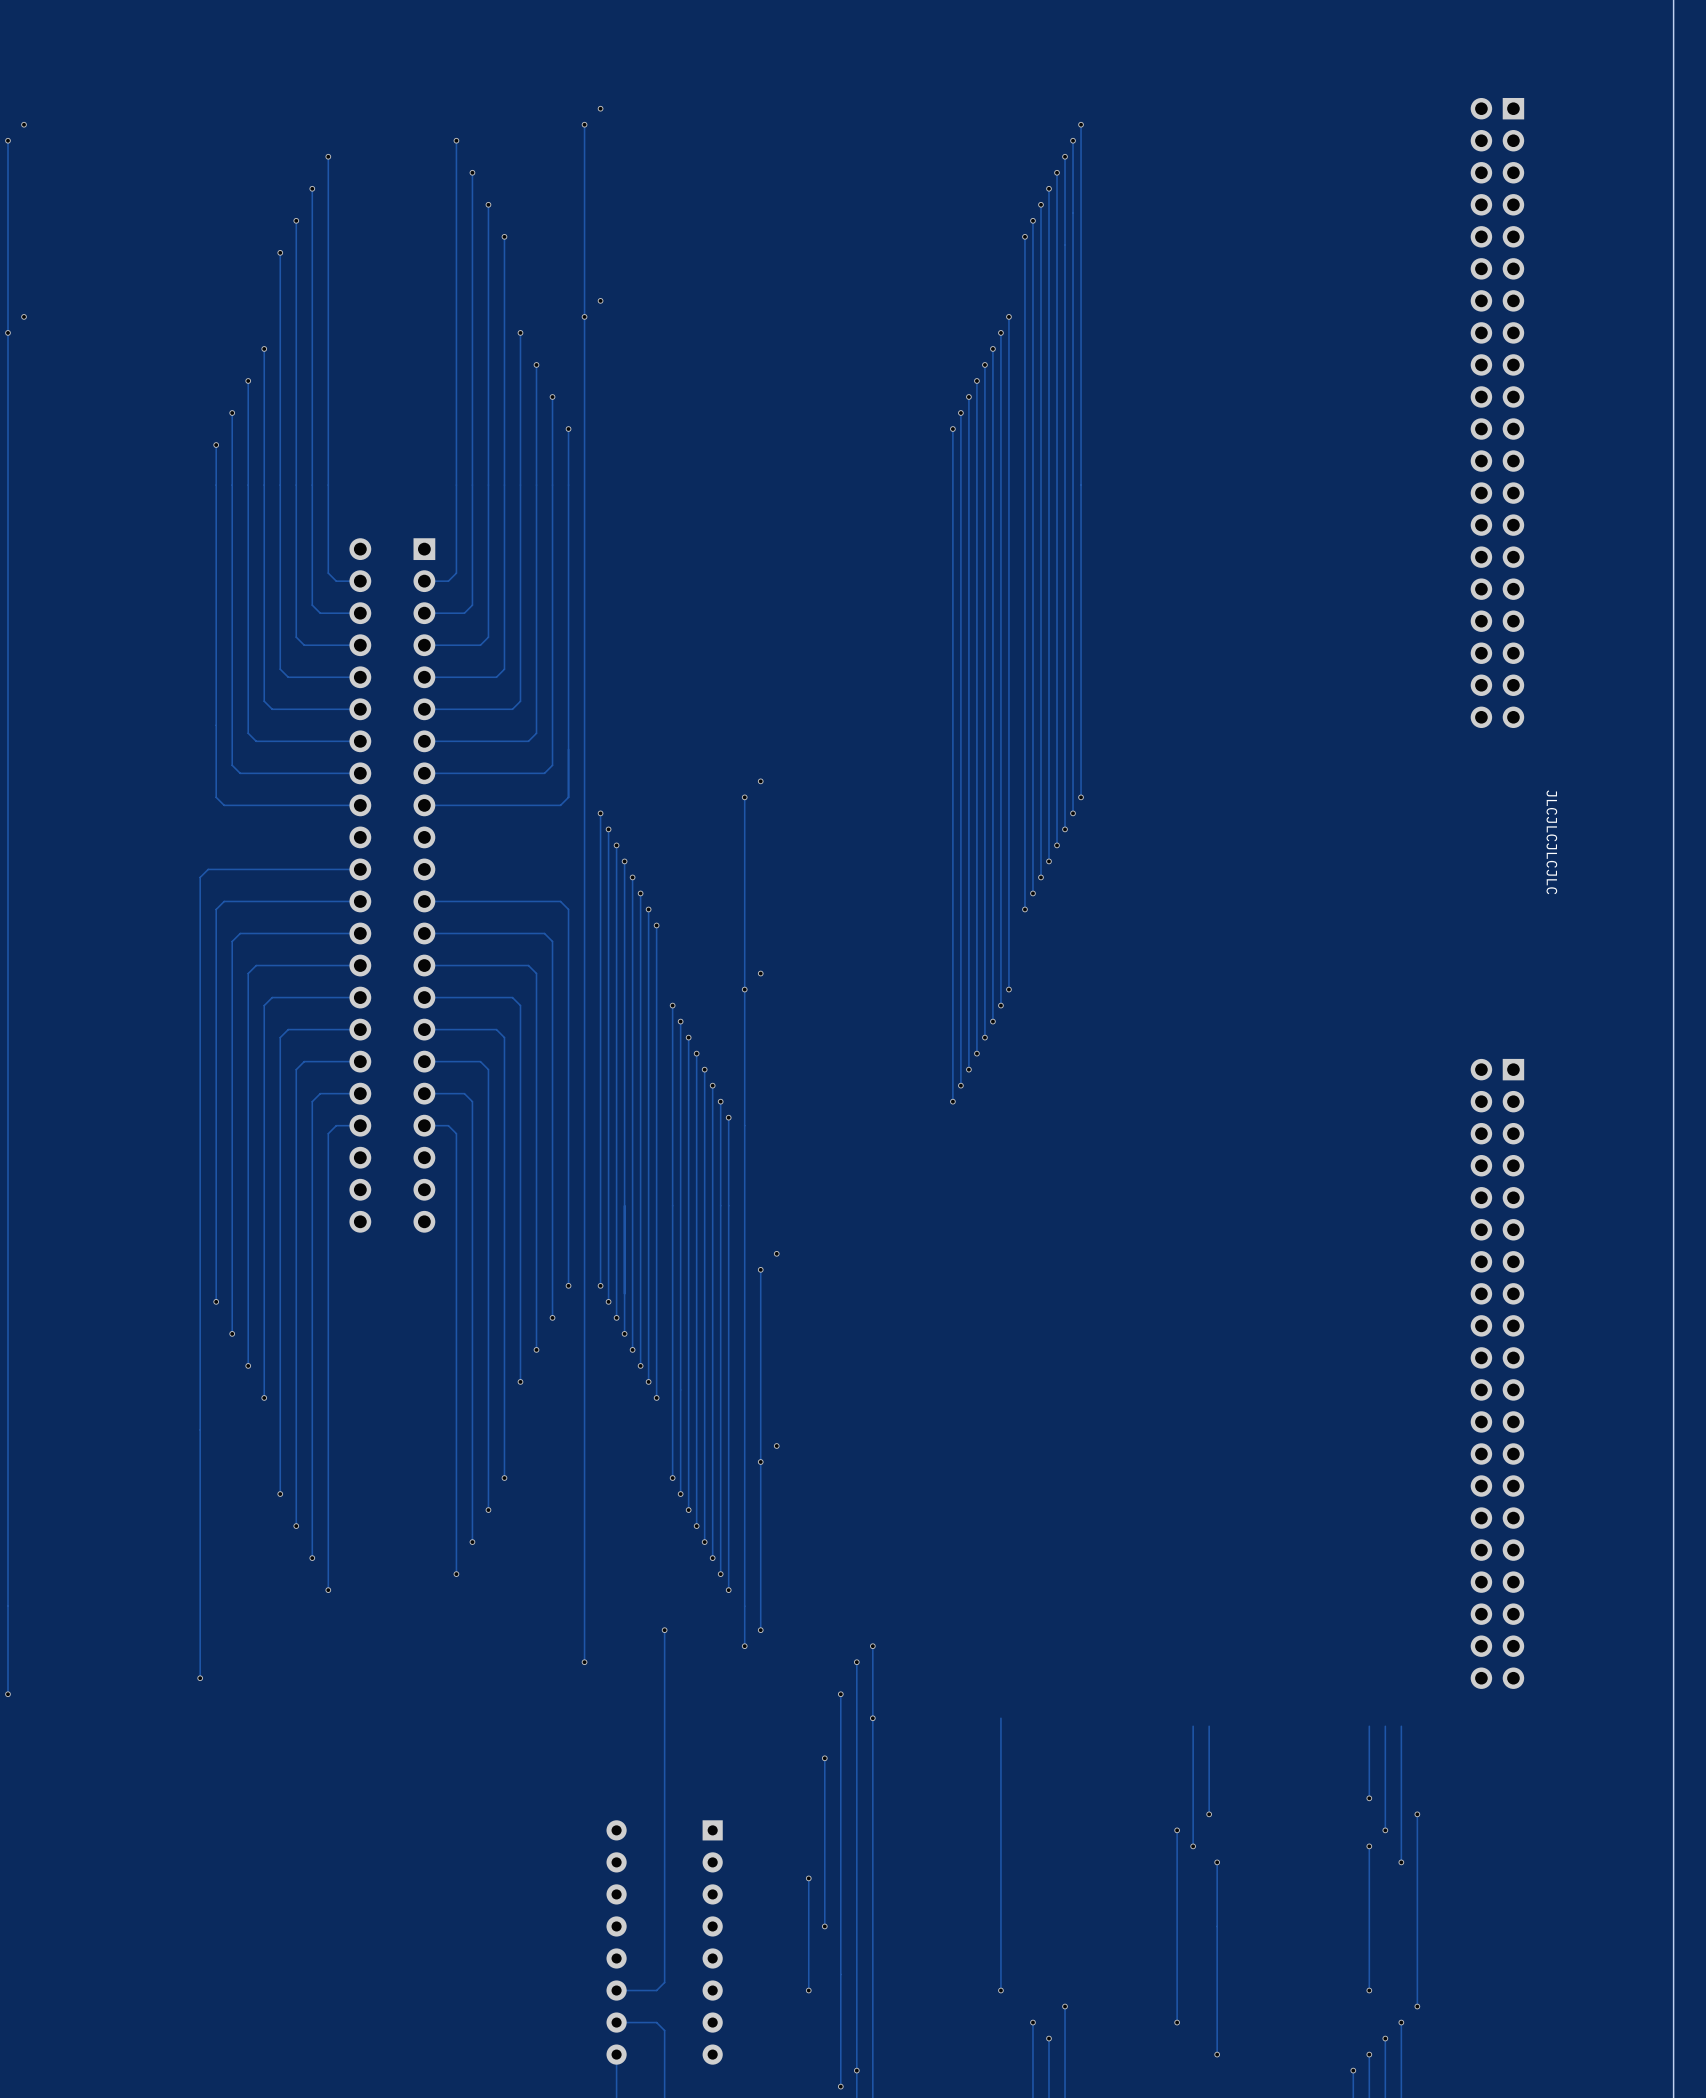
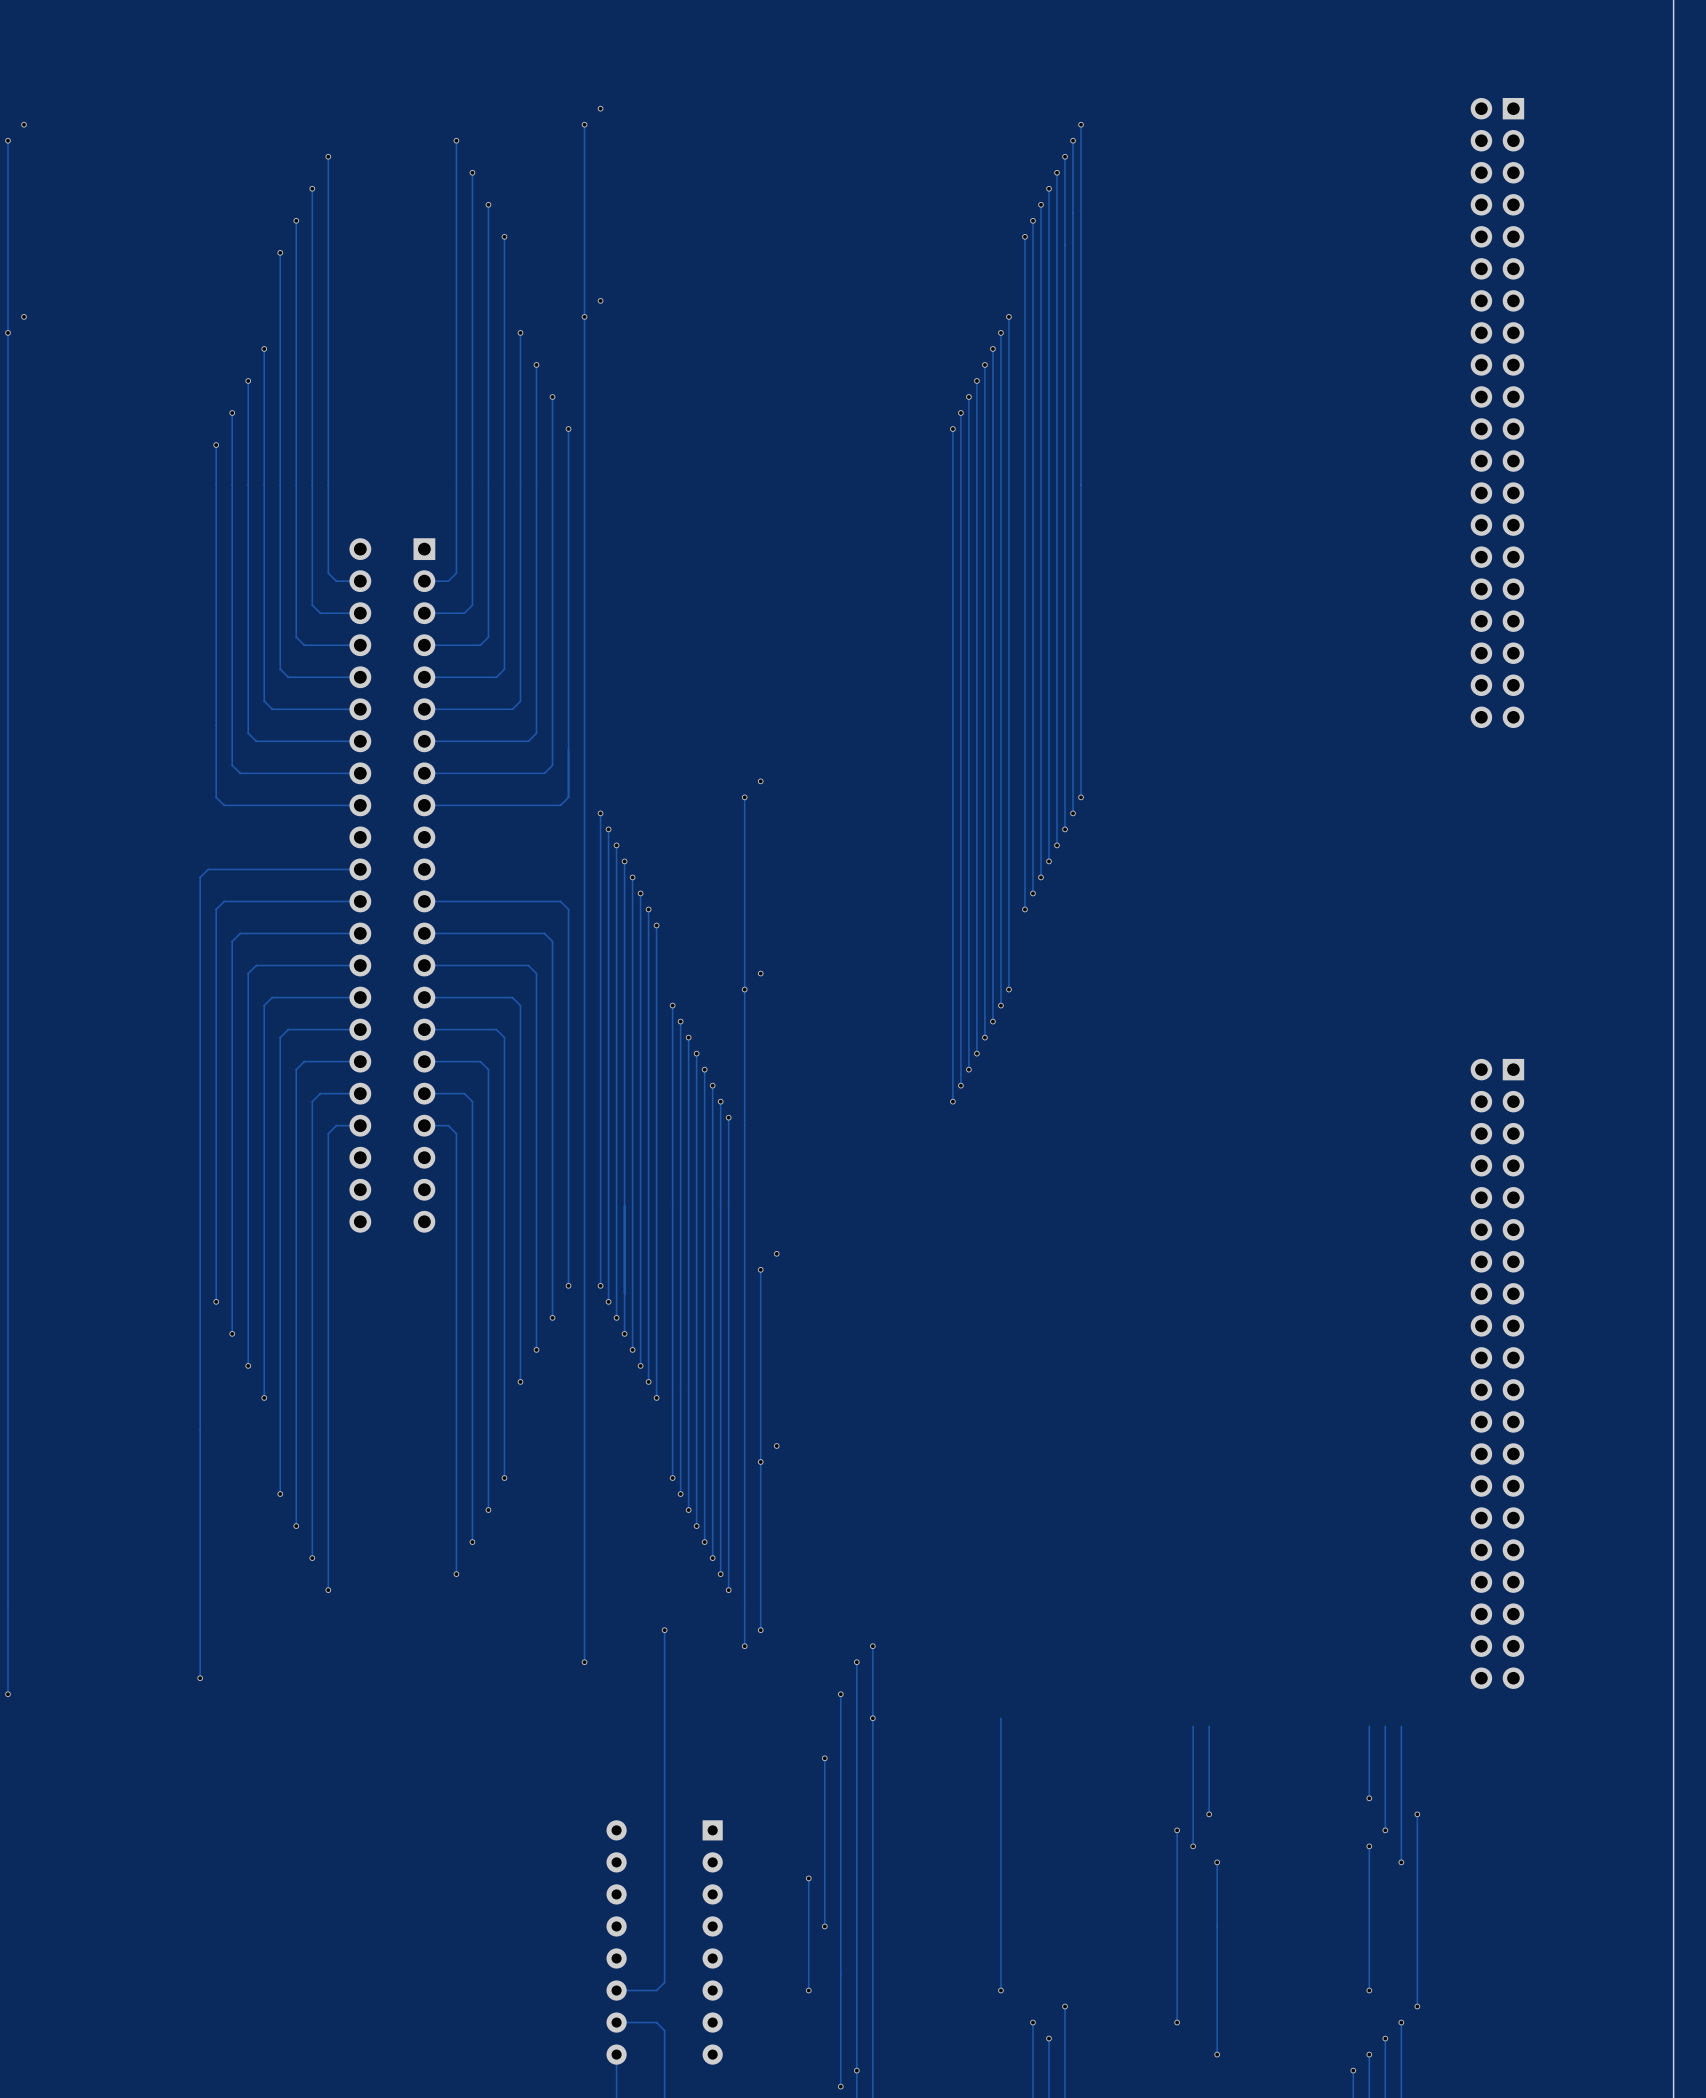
text: JLCJLCJLCJLC (1551, 842) -> none

